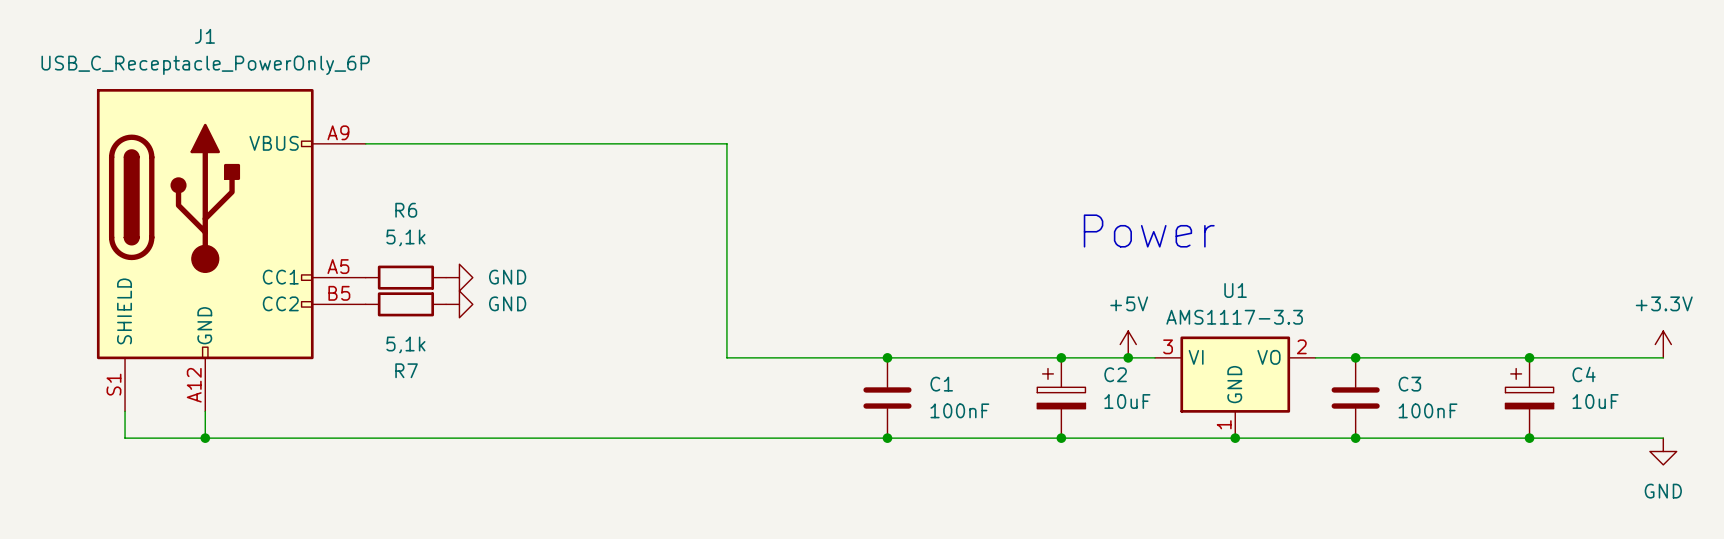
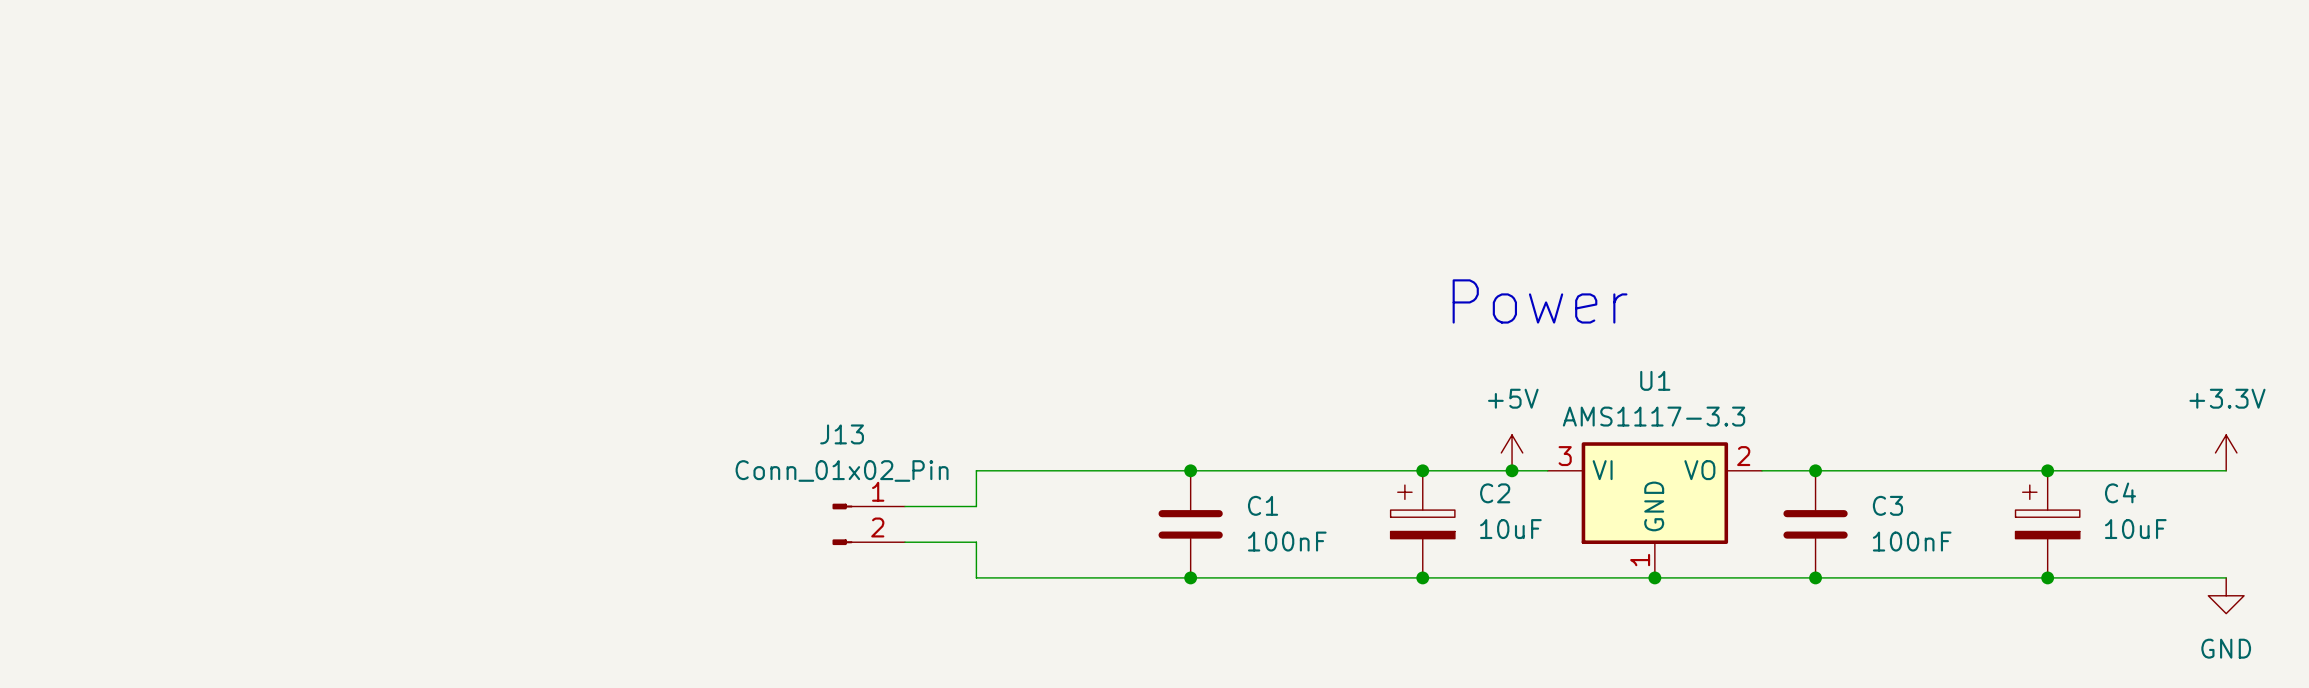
wire: (365, 143) (726, 143) (726, 357) -> (904, 506) (976, 506) (976, 470)
J1: USB_C_Receptacle_PowerOnly_6P (231, 250) -> none
R6: 5,1k (405, 277) -> none
power symbol: GND (459, 277) -> none
R7: 5,1k (405, 304) -> none
power symbol: GND (459, 304) -> none
J13: none -> Conn_01x02_Pin (868, 524)
wire: (125, 411) (125, 438) (726, 438) -> (904, 542) (976, 542) (976, 577)
wire: (205, 411) (205, 438) -> none
junction: (205, 438) -> none

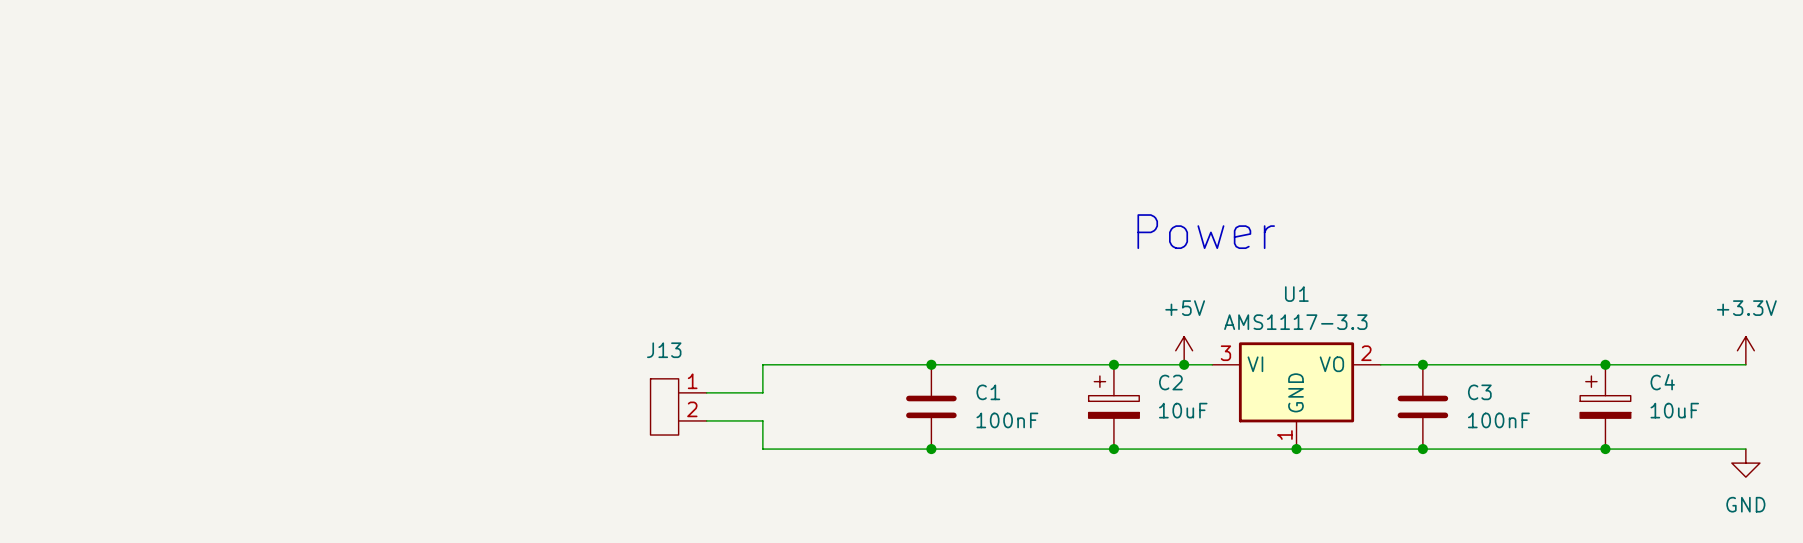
J13 value: Conn_01x02_Pin (842, 470) -> none
J13 symbol: [832, 503, 905, 546] -> [650, 378, 707, 436]

